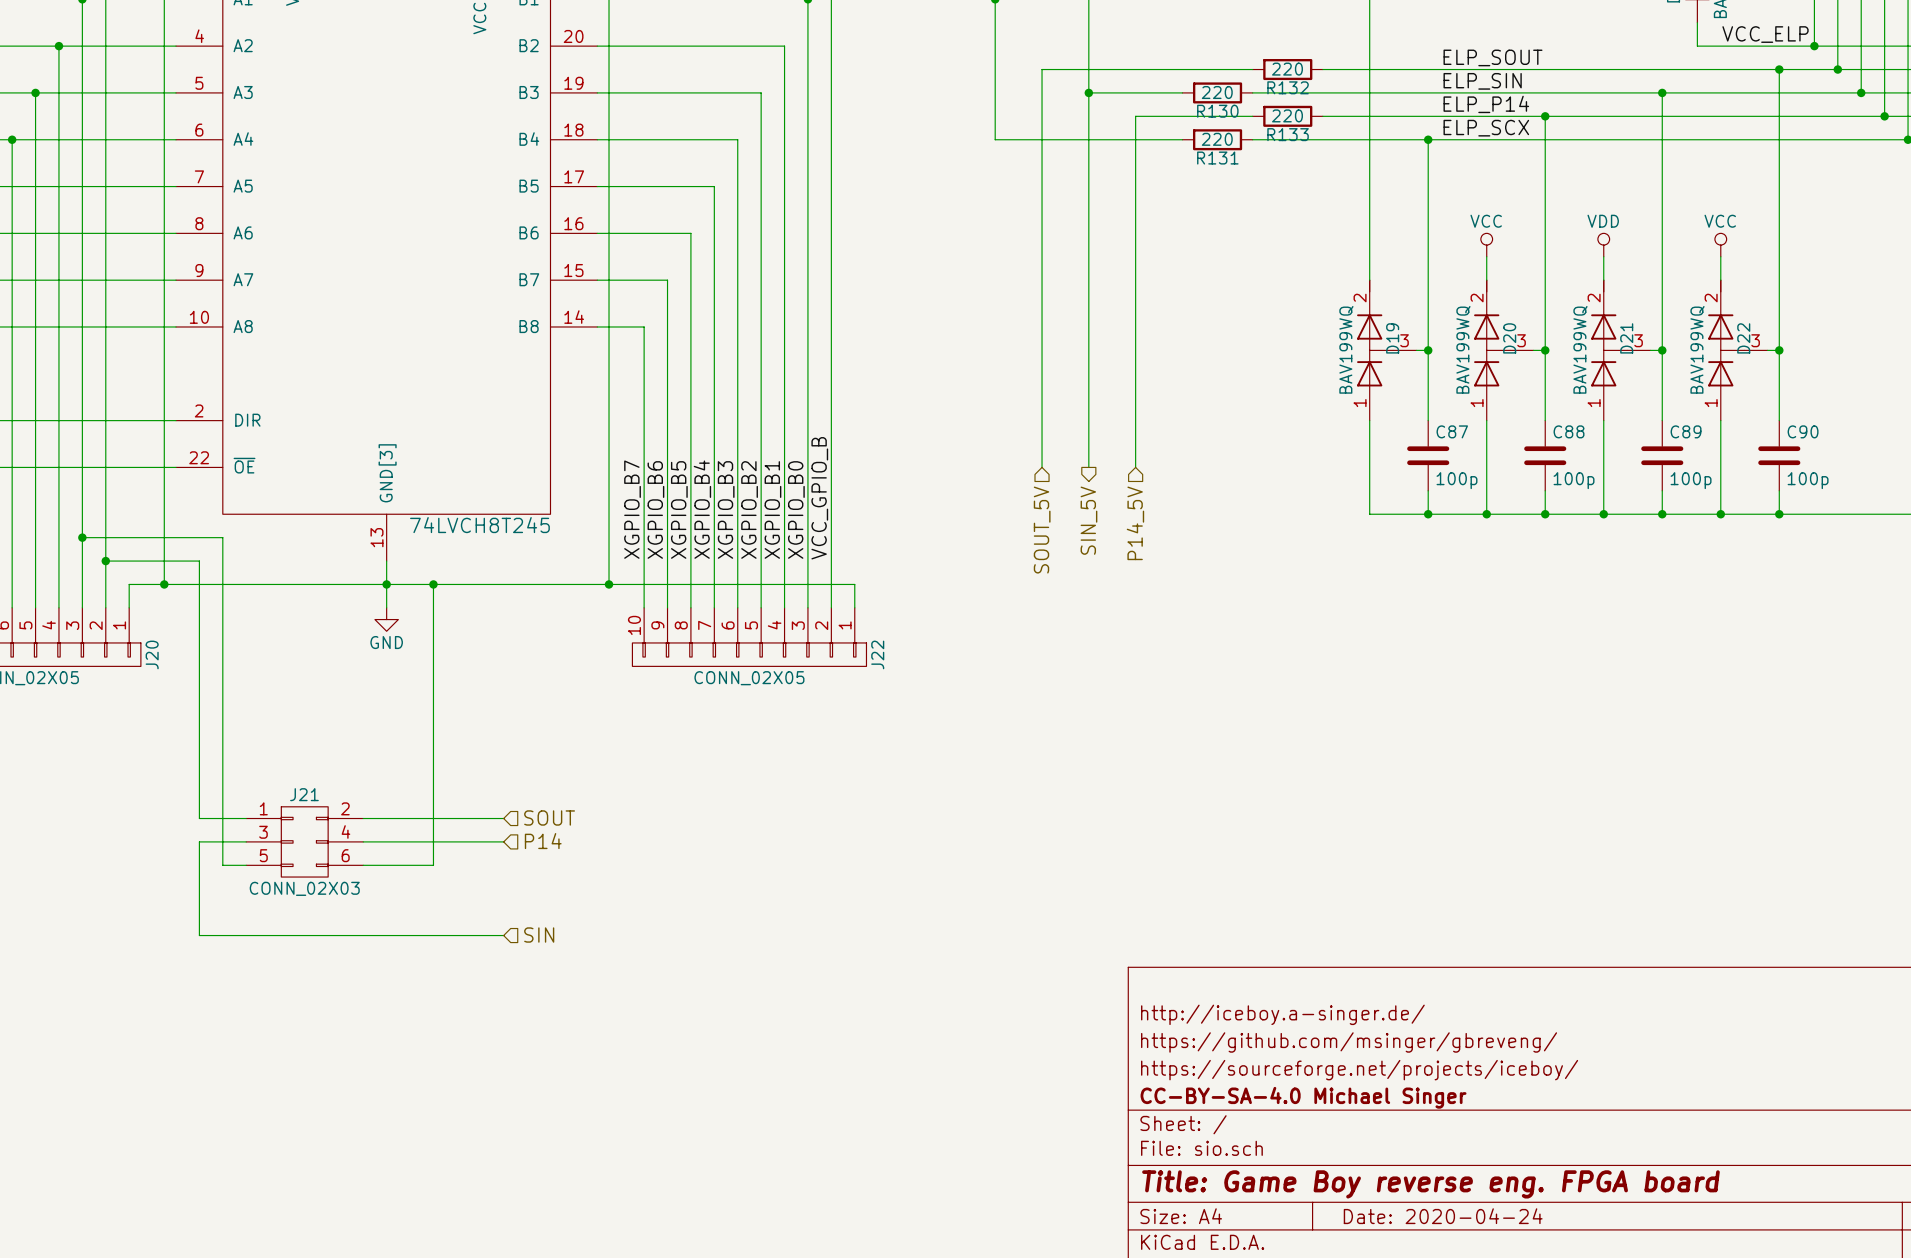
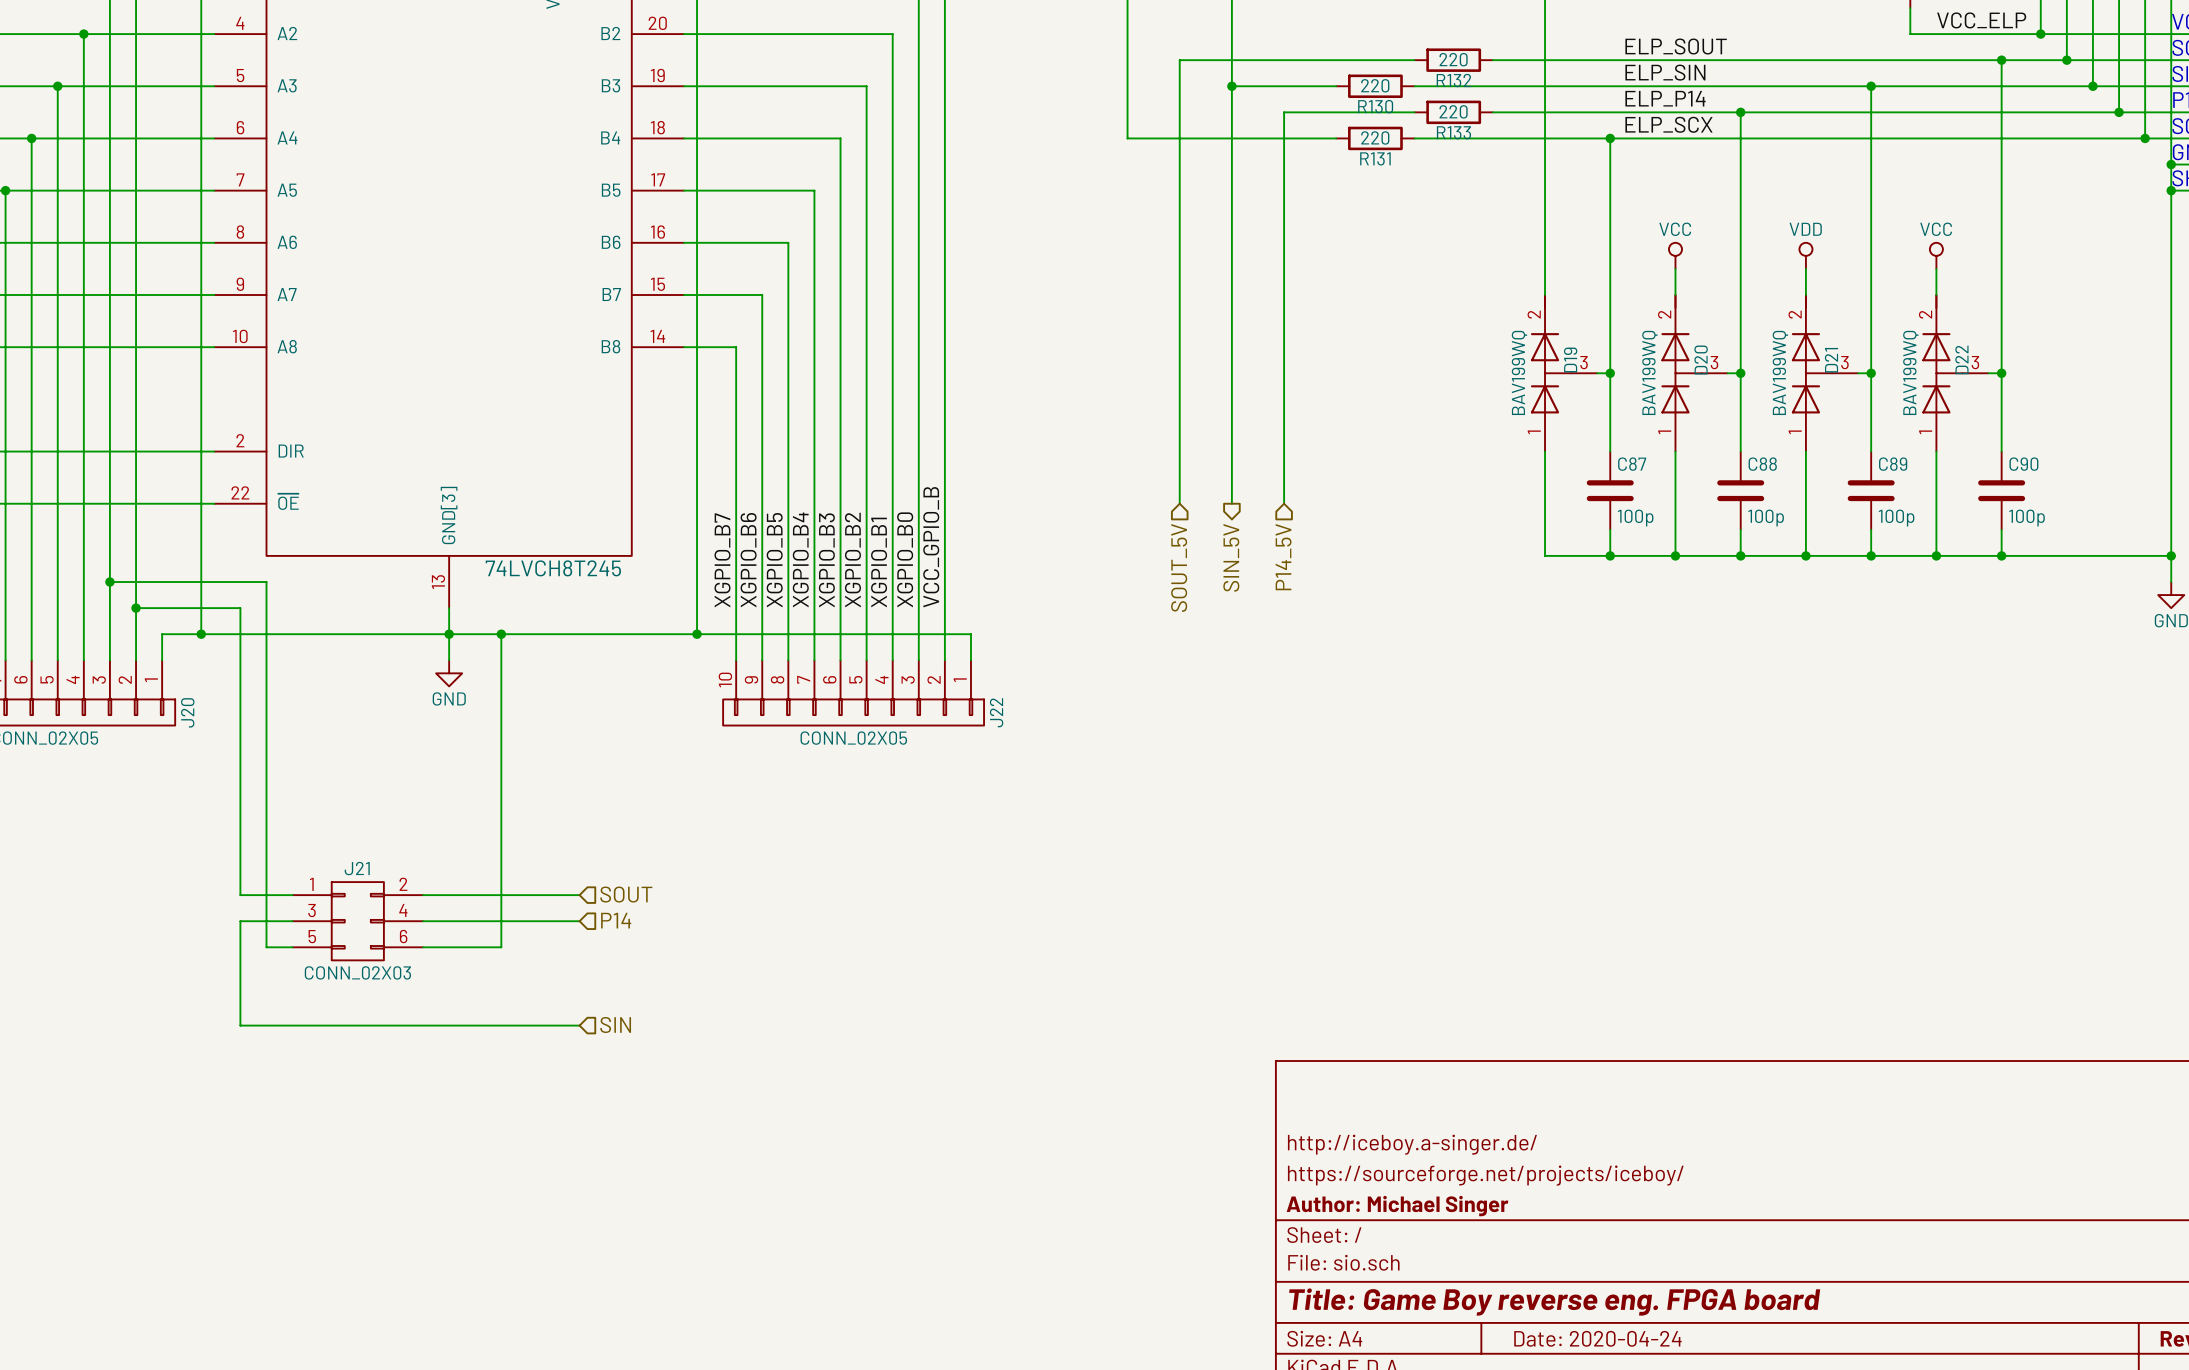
title block: http://iceboy.a-singer.de/ (1282, 1014) -> none
title block: https://github.com/msinger/gbreveng/ (1349, 1042) -> http://iceboy.a-singer.de/ (1412, 1144)
title block: CC-BY-SA-4.0 Michael Singer (1303, 1097) -> Author: Michael Singer (1397, 1206)

